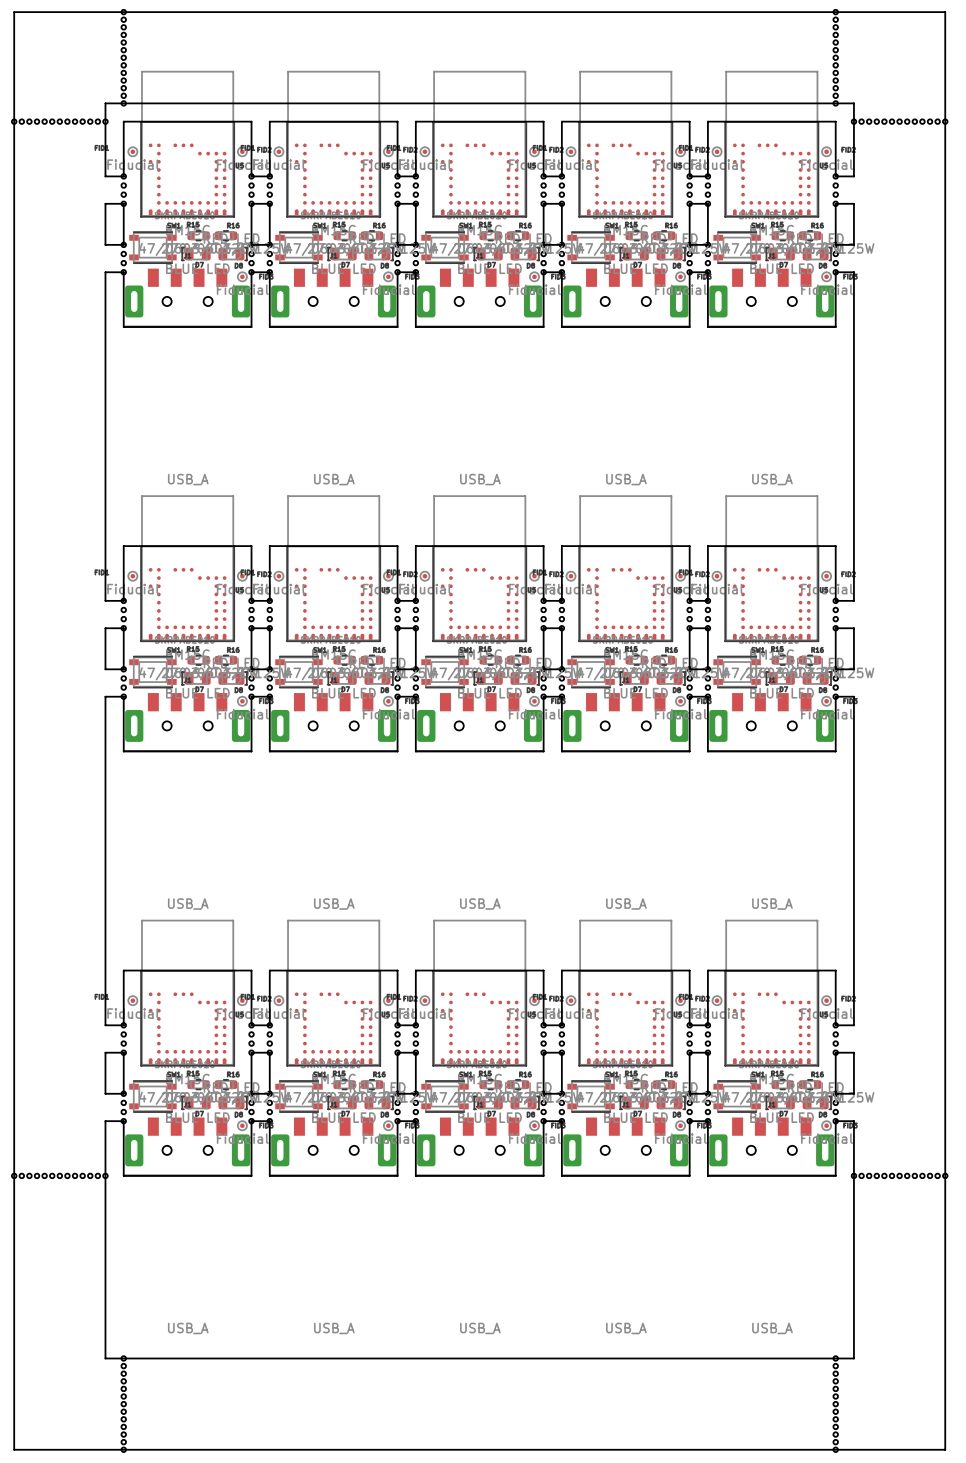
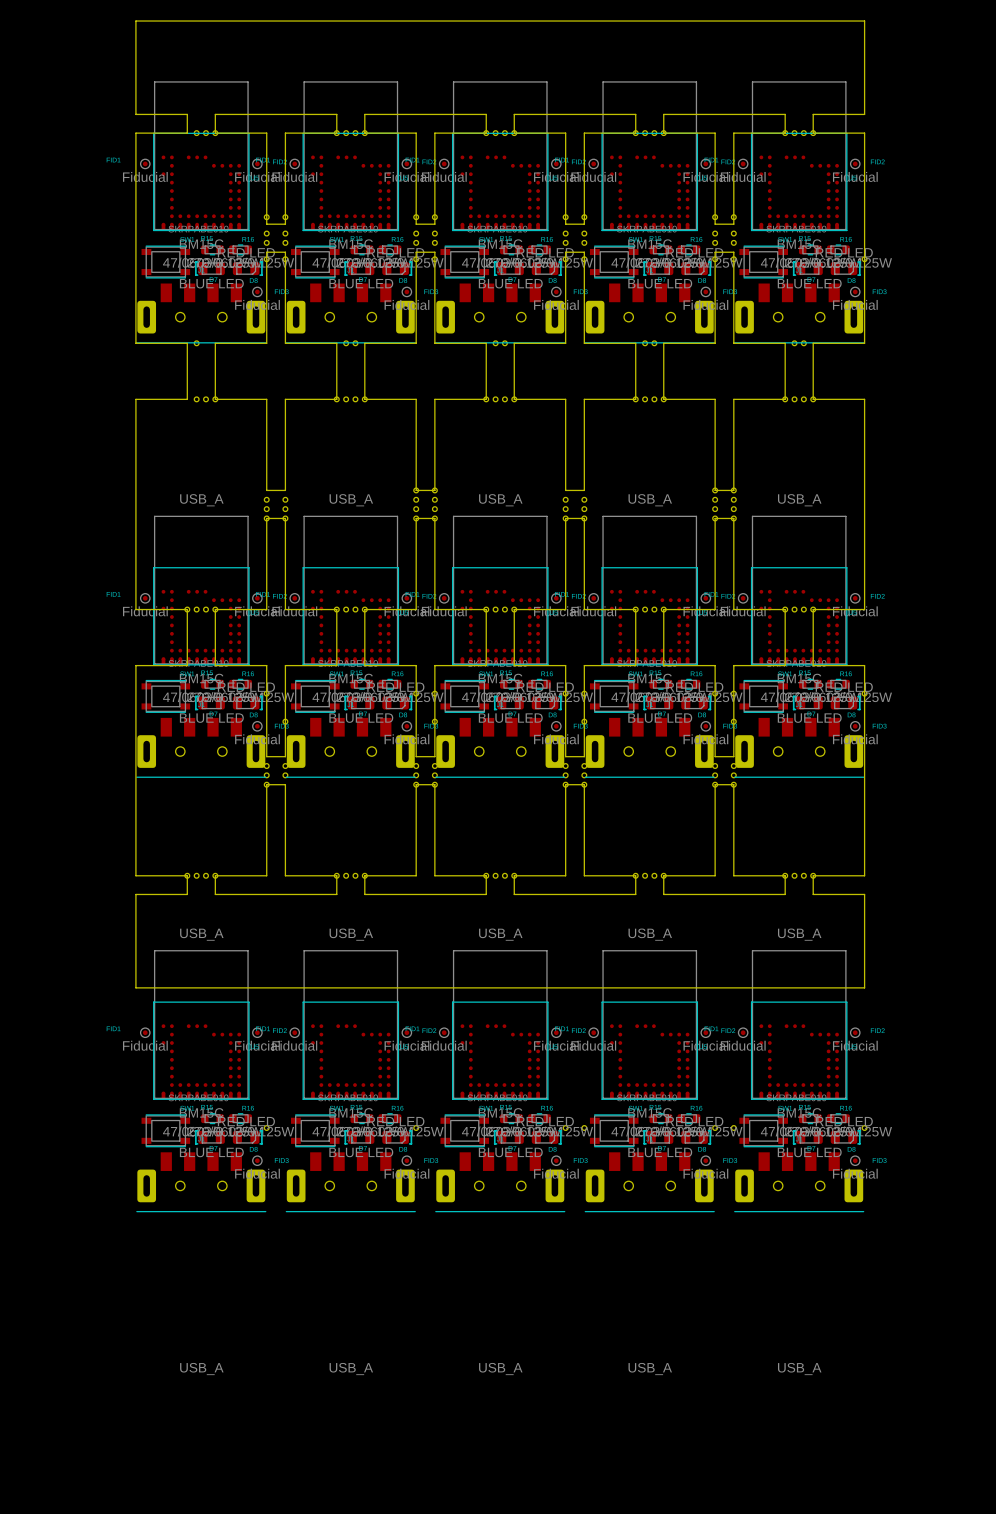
board edge: (123, 12) (14, 12) (14, 1449) (945, 1449) (945, 12) (835, 12) -> none
part: (123, 12) -> none
part: (835, 12) -> none
part: (123, 19) -> none
part: (835, 19) -> none
part: (123, 27) -> none
part: (835, 27) -> none
part: (123, 34) -> none
part: (835, 34) -> none
part: (123, 42) -> none
part: (835, 42) -> none
part: (123, 50) -> none
part: (835, 50) -> none
part: (123, 57) -> none
part: (835, 57) -> none
part: (123, 65) -> none
part: (835, 65) -> none
part: (123, 72) -> none
part: (835, 72) -> none
part: (123, 80) -> none
part: (835, 80) -> none
part: (123, 88) -> none
part: (835, 88) -> none
part: (123, 95) -> none
part: (835, 95) -> none
board edge: (123, 103) (105, 103) (105, 176) (123, 176) -> (135, 114) (135, 21)
part: (123, 103) -> none
board edge: (173, 103) (201, 103) -> (187, 114) (187, 133)
board edge: (319, 103) (347, 103) -> (336, 114) (336, 133)
board edge: (466, 103) (493, 103) -> (486, 114) (486, 133)
board edge: (612, 103) (639, 103) -> (635, 114) (635, 133)
board edge: (758, 103) (785, 103) -> (785, 114) (785, 133)
board edge: (835, 103) (853, 103) (853, 176) (835, 176) -> (864, 114) (864, 21)
part: (835, 103) -> none
part: (14, 121) -> none
part: (21, 121) -> none
part: (29, 121) -> none
part: (37, 121) -> none
part: (44, 121) -> none
part: (52, 121) -> none
part: (59, 121) -> none
part: (67, 121) -> none
part: (75, 121) -> none
part: (82, 121) -> none
part: (90, 121) -> none
part: (97, 121) -> none
part: (105, 121) -> none
board edge: (173, 121) (201, 121) -> (215, 114) (215, 133)
part: none -> (196, 133)
part: none -> (206, 133)
part: none -> (215, 133)
board edge: (319, 121) (347, 121) -> (364, 114) (364, 133)
part: none -> (336, 133)
part: none -> (346, 133)
part: none -> (355, 133)
part: none -> (364, 133)
board edge: (466, 121) (493, 121) -> (514, 114) (514, 133)
part: none -> (486, 133)
part: none -> (495, 133)
part: none -> (504, 133)
part: none -> (514, 133)
board edge: (612, 121) (639, 121) -> (663, 114) (663, 133)
part: none -> (635, 133)
part: none -> (645, 133)
part: none -> (654, 133)
part: none -> (663, 133)
board edge: (758, 121) (785, 121) -> (813, 114) (813, 133)
part: none -> (785, 133)
part: none -> (794, 133)
part: none -> (803, 133)
part: none -> (813, 133)
part: (853, 121) -> none
part: (861, 121) -> none
part: (869, 121) -> none
part: (876, 121) -> none
part: (884, 121) -> none
part: (892, 121) -> none
part: (899, 121) -> none
part: (907, 121) -> none
part: (914, 121) -> none
part: (922, 121) -> none
part: (930, 121) -> none
part: (937, 121) -> none
part: (945, 121) -> none
part: (123, 176) -> none
board edge: (251, 176) (269, 176) -> (266, 189) (266, 217)
part: (251, 176) -> none
part: (269, 176) -> none
board edge: (397, 176) (415, 176) -> (416, 189) (416, 217)
part: (397, 176) -> none
part: (415, 176) -> none
board edge: (543, 176) (561, 176) -> (565, 189) (565, 217)
part: (543, 176) -> none
part: (561, 176) -> none
board edge: (689, 176) (707, 176) -> (715, 189) (715, 217)
part: (689, 176) -> none
part: (707, 176) -> none
part: (835, 176) -> none
part: (123, 185) -> none
part: (251, 185) -> none
part: (269, 185) -> none
part: (397, 185) -> none
part: (415, 185) -> none
part: (543, 185) -> none
part: (561, 185) -> none
part: (689, 185) -> none
part: (707, 185) -> none
part: (835, 185) -> none
part: (123, 194) -> none
part: (251, 194) -> none
part: (269, 194) -> none
part: (397, 194) -> none
part: (415, 194) -> none
part: (543, 194) -> none
part: (561, 194) -> none
part: (689, 194) -> none
part: (707, 194) -> none
part: (835, 194) -> none
board edge: (123, 203) (105, 203) (105, 244) (123, 244) -> (135, 217) (135, 189)
part: (123, 203) -> none
board edge: (251, 203) (269, 203) -> (285, 189) (285, 217)
board edge: (397, 203) (415, 203) -> (434, 189) (434, 217)
board edge: (543, 203) (561, 203) -> (584, 189) (584, 217)
board edge: (689, 203) (707, 203) -> (733, 189) (733, 217)
board edge: (835, 203) (853, 203) (853, 244) (835, 244) -> (864, 217) (864, 189)
part: (835, 203) -> none
board edge: (251, 210) (251, 238) -> (266, 224) (285, 224)
board edge: (269, 210) (269, 238) -> (266, 252) (285, 252)
board edge: (397, 210) (397, 238) -> (416, 224) (434, 224)
board edge: (415, 210) (415, 238) -> (416, 252) (434, 252)
board edge: (543, 210) (543, 238) -> (565, 224) (584, 224)
board edge: (561, 210) (561, 238) -> (565, 252) (584, 252)
board edge: (689, 210) (689, 238) -> (715, 224) (733, 224)
board edge: (707, 210) (707, 238) -> (715, 252) (733, 252)
part: none -> (266, 233)
part: none -> (285, 233)
part: none -> (416, 233)
part: none -> (434, 233)
part: none -> (565, 233)
part: none -> (584, 233)
part: none -> (715, 233)
part: none -> (733, 233)
part: none -> (266, 242)
part: none -> (285, 242)
part: none -> (416, 242)
part: none -> (434, 242)
part: none -> (565, 242)
part: none -> (584, 242)
part: none -> (715, 242)
part: none -> (733, 242)
part: (123, 244) -> none
board edge: (251, 244) (269, 244) -> (266, 259) (266, 287)
board edge: (397, 244) (415, 244) -> (416, 259) (416, 287)
board edge: (543, 244) (561, 244) -> (565, 259) (565, 287)
board edge: (689, 244) (707, 244) -> (715, 259) (715, 287)
part: (123, 254) -> none
part: (251, 254) -> none
part: (269, 254) -> none
part: (397, 254) -> none
part: (415, 254) -> none
part: (543, 254) -> none
part: (561, 254) -> none
part: (689, 254) -> none
part: (707, 254) -> none
part: (835, 254) -> none
part: (123, 263) -> none
part: (251, 263) -> none
part: (269, 263) -> none
part: (397, 263) -> none
part: (415, 263) -> none
part: (543, 263) -> none
part: (561, 263) -> none
part: (689, 263) -> none
part: (707, 263) -> none
part: (835, 263) -> none
board edge: (123, 272) (105, 272) (105, 600) (123, 600) (123, 587) -> (135, 287) (135, 259)
part: (123, 272) -> none
board edge: (251, 272) (269, 272) -> (285, 259) (285, 287)
part: (251, 272) -> none
part: (269, 272) -> none
board edge: (397, 272) (415, 272) -> (434, 259) (434, 287)
part: (397, 272) -> none
part: (415, 272) -> none
board edge: (543, 272) (561, 272) -> (584, 259) (584, 287)
part: (543, 272) -> none
part: (561, 272) -> none
board edge: (689, 272) (707, 272) -> (733, 259) (733, 287)
part: (689, 272) -> none
part: (707, 272) -> none
board edge: (835, 272) (853, 272) (853, 600) (835, 600) (835, 587) -> (864, 287) (864, 259)
part: (835, 272) -> none
board edge: (173, 327) (201, 327) -> (336, 343) (336, 399) (285, 399) (285, 490) (266, 490) (266, 399) (215, 399) (215, 343)
part: none -> (196, 343)
board edge: (319, 327) (347, 327) -> (486, 343) (486, 399) (434, 399) (434, 490) (416, 490) (416, 399) (364, 399) (364, 343)
part: none -> (346, 343)
part: none -> (355, 343)
board edge: (466, 327) (493, 327) -> (635, 343) (635, 399) (584, 399) (584, 490) (565, 490) (565, 399) (514, 399) (514, 343)
part: none -> (495, 343)
part: none -> (504, 343)
board edge: (612, 327) (639, 327) -> (785, 343) (785, 399) (733, 399) (733, 490) (715, 490) (715, 399) (663, 399) (663, 343)
part: none -> (645, 343)
part: none -> (654, 343)
board edge: (758, 327) (785, 327) -> (864, 567) (864, 399) (813, 399) (813, 343)
part: none -> (794, 343)
part: none -> (803, 343)
part: none -> (196, 399)
part: none -> (206, 399)
part: none -> (215, 399)
part: none -> (336, 399)
part: none -> (346, 399)
part: none -> (355, 399)
part: none -> (364, 399)
part: none -> (486, 399)
part: none -> (495, 399)
part: none -> (504, 399)
part: none -> (514, 399)
part: none -> (635, 399)
part: none -> (645, 399)
part: none -> (654, 399)
part: none -> (663, 399)
part: none -> (785, 399)
part: none -> (794, 399)
part: none -> (803, 399)
part: none -> (813, 399)
part: none -> (416, 490)
part: none -> (434, 490)
part: none -> (715, 490)
part: none -> (733, 490)
part: none -> (266, 499)
part: none -> (285, 499)
part: none -> (416, 499)
part: none -> (434, 499)
part: none -> (565, 499)
part: none -> (584, 499)
part: none -> (715, 499)
part: none -> (733, 499)
part: none -> (266, 509)
part: none -> (285, 509)
part: none -> (416, 509)
part: none -> (434, 509)
part: none -> (565, 509)
part: none -> (584, 509)
part: none -> (715, 509)
part: none -> (733, 509)
part: none -> (266, 518)
part: none -> (285, 518)
part: none -> (416, 518)
part: none -> (434, 518)
part: none -> (565, 518)
part: none -> (584, 518)
part: none -> (715, 518)
part: none -> (733, 518)
board edge: (123, 546) (251, 546) -> (135, 567) (135, 399) (187, 399) (187, 343)
board edge: (269, 546) (397, 546) -> (285, 567) (285, 518) (266, 518) (266, 567)
board edge: (415, 546) (543, 546) -> (434, 567) (434, 518) (416, 518) (416, 567)
board edge: (561, 546) (689, 546) -> (584, 567) (584, 518) (565, 518) (565, 567)
board edge: (707, 546) (835, 546) -> (733, 567) (733, 518) (715, 518) (715, 567)
board edge: none -> (135, 609) (187, 609) (187, 665) (135, 665)
part: none -> (187, 609)
part: none -> (196, 609)
part: none -> (206, 609)
part: none -> (215, 609)
board edge: (251, 587) (251, 600) (269, 600) (269, 587) -> (266, 609) (215, 609) (215, 665) (266, 665)
part: none -> (336, 609)
part: none -> (346, 609)
part: none -> (355, 609)
part: none -> (364, 609)
board edge: (397, 587) (397, 600) (415, 600) (415, 587) -> (416, 609) (364, 609) (364, 665) (416, 665)
part: none -> (486, 609)
part: none -> (495, 609)
part: none -> (504, 609)
part: none -> (514, 609)
board edge: (543, 587) (543, 600) (561, 600) (561, 587) -> (565, 609) (514, 609) (514, 665) (565, 665)
part: none -> (635, 609)
part: none -> (645, 609)
part: none -> (654, 609)
part: none -> (663, 609)
board edge: (689, 587) (689, 600) (707, 600) (707, 587) -> (715, 609) (663, 609) (663, 665) (715, 665)
part: none -> (785, 609)
part: none -> (794, 609)
part: none -> (803, 609)
part: none -> (813, 609)
board edge: none -> (864, 609) (813, 609) (813, 665) (864, 665)
part: (123, 600) -> none
part: (251, 600) -> none
part: (269, 600) -> none
part: (397, 600) -> none
part: (415, 600) -> none
part: (543, 600) -> none
part: (561, 600) -> none
part: (689, 600) -> none
part: (707, 600) -> none
part: (835, 600) -> none
part: (123, 609) -> none
part: (251, 609) -> none
part: (269, 609) -> none
part: (397, 609) -> none
part: (415, 609) -> none
part: (543, 609) -> none
part: (561, 609) -> none
part: (689, 609) -> none
part: (707, 609) -> none
part: (835, 609) -> none
part: (123, 619) -> none
part: (251, 619) -> none
part: (269, 619) -> none
part: (397, 619) -> none
part: (415, 619) -> none
part: (543, 619) -> none
part: (561, 619) -> none
part: (689, 619) -> none
part: (707, 619) -> none
part: (835, 619) -> none
part: (123, 628) -> none
part: (251, 628) -> none
part: (269, 628) -> none
part: (397, 628) -> none
part: (415, 628) -> none
part: (543, 628) -> none
part: (561, 628) -> none
part: (689, 628) -> none
part: (707, 628) -> none
part: (835, 628) -> none
board edge: (123, 641) (123, 628) (105, 628) (105, 669) (123, 669) -> (135, 721) (135, 693)
board edge: (251, 641) (251, 628) (269, 628) (269, 641) -> (285, 609) (336, 609) (336, 665) (285, 665)
board edge: (397, 641) (397, 628) (415, 628) (415, 641) -> (434, 609) (486, 609) (486, 665) (434, 665)
board edge: (543, 641) (543, 628) (561, 628) (561, 641) -> (584, 609) (635, 609) (635, 665) (584, 665)
board edge: (689, 641) (689, 628) (707, 628) (707, 641) -> (733, 609) (785, 609) (785, 665) (733, 665)
board edge: (835, 641) (835, 628) (853, 628) (853, 669) (835, 669) -> (864, 721) (864, 693)
part: (123, 669) -> none
board edge: (251, 669) (269, 669) -> (266, 693) (266, 721)
part: (269, 669) -> none
board edge: (397, 669) (415, 669) -> (416, 693) (416, 721)
board edge: (543, 669) (561, 669) -> (565, 693) (565, 721)
board edge: (689, 669) (707, 669) -> (715, 693) (715, 721)
part: (123, 678) -> none
part: (251, 678) -> none
part: (269, 678) -> none
part: (397, 678) -> none
part: (415, 678) -> none
part: (543, 678) -> none
part: (561, 678) -> none
part: (689, 678) -> none
part: (707, 678) -> none
part: (835, 678) -> none
part: (123, 687) -> none
part: (251, 687) -> none
part: (269, 687) -> none
part: (397, 687) -> none
part: (415, 687) -> none
part: (543, 687) -> none
part: (561, 687) -> none
part: (689, 687) -> none
part: (707, 687) -> none
part: (835, 687) -> none
board edge: (123, 696) (105, 696) (105, 1025) (123, 1025) (123, 970) (251, 970) (251, 1025) (269, 1025) (269, 970) (397, 970) (397, 1025) (415, 1025) (415, 970) (543, 970) (543, 1025) (561, 1025) (561, 970) (689, 970) (689, 1025) (707, 1025) (707, 970) (835, 970) (835, 1025) (853, 1025) (853, 696) (835, 696) -> none
part: (123, 696) -> none
board edge: (251, 696) (269, 696) -> (285, 693) (285, 721)
part: (251, 696) -> none
board edge: (397, 696) (415, 696) -> (434, 693) (434, 721)
part: (397, 696) -> none
board edge: (543, 696) (561, 696) -> (584, 693) (584, 721)
part: (543, 696) -> none
board edge: (689, 696) (707, 696) -> (733, 693) (733, 721)
part: (689, 696) -> none
part: (835, 696) -> none
board edge: (251, 730) (251, 751) (123, 751) -> (864, 777) (864, 875) (813, 875) (813, 894) (864, 894) (864, 987) (135, 987) (135, 894) (187, 894) (187, 875) (135, 875) (135, 777)
board edge: (269, 730) (269, 751) (397, 751) (397, 730) -> (285, 756) (266, 756)
board edge: (415, 730) (415, 751) (543, 751) (543, 730) -> (434, 756) (416, 756)
board edge: (561, 730) (561, 751) (689, 751) (689, 730) -> (584, 756) (565, 756)
board edge: (707, 730) (707, 751) (835, 751) -> (733, 756) (715, 756)
part: none -> (266, 766)
part: none -> (285, 766)
part: none -> (416, 766)
part: none -> (434, 766)
part: none -> (565, 766)
part: none -> (584, 766)
part: none -> (715, 766)
part: none -> (733, 766)
part: none -> (266, 775)
part: none -> (285, 775)
part: none -> (416, 775)
part: none -> (434, 775)
part: none -> (565, 775)
part: none -> (584, 775)
part: none -> (715, 775)
part: none -> (733, 775)
board edge: none -> (266, 784) (266, 875) (215, 875) (215, 894) (336, 894) (336, 875) (285, 875) (285, 784) (266, 784)
part: none -> (266, 784)
board edge: none -> (416, 784) (434, 784) (434, 875) (486, 875) (486, 894) (364, 894) (364, 875) (416, 875) (416, 784)
part: none -> (416, 784)
part: none -> (434, 784)
board edge: none -> (565, 784) (584, 784) (584, 875) (635, 875) (635, 894) (514, 894) (514, 875) (565, 875) (565, 784)
part: none -> (565, 784)
part: none -> (584, 784)
board edge: none -> (715, 784) (733, 784) (733, 875) (785, 875) (785, 894) (663, 894) (663, 875) (715, 875) (715, 784)
part: none -> (715, 784)
part: none -> (733, 784)
part: none -> (187, 875)
part: none -> (196, 875)
part: none -> (206, 875)
part: none -> (215, 875)
part: none -> (336, 875)
part: none -> (346, 875)
part: none -> (355, 875)
part: none -> (364, 875)
part: none -> (486, 875)
part: none -> (495, 875)
part: none -> (504, 875)
part: none -> (514, 875)
part: none -> (635, 875)
part: none -> (645, 875)
part: none -> (654, 875)
part: none -> (663, 875)
part: none -> (785, 875)
part: none -> (794, 875)
part: none -> (803, 875)
part: none -> (813, 875)
part: (123, 1025) -> none
part: (251, 1025) -> none
part: (269, 1025) -> none
part: (397, 1025) -> none
part: (415, 1025) -> none
part: (543, 1025) -> none
part: (561, 1025) -> none
part: (689, 1025) -> none
part: (707, 1025) -> none
part: (835, 1025) -> none
part: (123, 1034) -> none
part: (251, 1034) -> none
part: (269, 1034) -> none
part: (397, 1034) -> none
part: (415, 1034) -> none
part: (543, 1034) -> none
part: (561, 1034) -> none
part: (689, 1034) -> none
part: (707, 1034) -> none
part: (835, 1034) -> none
part: (123, 1043) -> none
part: (251, 1043) -> none
part: (269, 1043) -> none
part: (397, 1043) -> none
part: (415, 1043) -> none
part: (543, 1043) -> none
part: (561, 1043) -> none
part: (689, 1043) -> none
part: (707, 1043) -> none
part: (835, 1043) -> none
board edge: (105, 1052) (105, 1093) (123, 1093) (123, 1052) (105, 1052) -> none
part: (123, 1052) -> none
board edge: (251, 1052) (269, 1052) (269, 1093) (251, 1093) (251, 1052) -> none
part: (251, 1052) -> none
part: (269, 1052) -> none
board edge: (397, 1052) (415, 1052) (415, 1093) (397, 1093) (397, 1052) -> none
part: (397, 1052) -> none
part: (415, 1052) -> none
board edge: (543, 1052) (561, 1052) (561, 1093) (543, 1093) (543, 1052) -> none
part: (543, 1052) -> none
part: (561, 1052) -> none
board edge: (689, 1052) (707, 1052) (707, 1093) (689, 1093) (689, 1052) -> none
part: (689, 1052) -> none
part: (707, 1052) -> none
board edge: (835, 1052) (853, 1052) (853, 1093) (835, 1093) (835, 1052) -> none
part: (835, 1052) -> none
part: (123, 1093) -> none
part: (269, 1093) -> none
part: (415, 1093) -> none
part: (123, 1102) -> none
part: (251, 1102) -> none
part: (269, 1102) -> none
part: (397, 1102) -> none
part: (415, 1102) -> none
part: (543, 1102) -> none
part: (561, 1102) -> none
part: (689, 1102) -> none
part: (707, 1102) -> none
part: (835, 1102) -> none
part: (123, 1112) -> none
part: (251, 1112) -> none
part: (269, 1112) -> none
part: (397, 1112) -> none
part: (415, 1112) -> none
part: (543, 1112) -> none
part: (561, 1112) -> none
part: (689, 1112) -> none
part: (707, 1112) -> none
part: (835, 1112) -> none
board edge: (105, 1121) (105, 1358) (853, 1358) (853, 1121) (835, 1121) (835, 1175) (707, 1175) (707, 1121) (689, 1121) (689, 1175) (561, 1175) (561, 1121) (543, 1121) (543, 1175) (415, 1175) (415, 1121) (397, 1121) (397, 1175) (269, 1175) (269, 1121) (251, 1121) (251, 1175) (123, 1175) (123, 1121) (105, 1121) -> none
part: (123, 1121) -> none
part: (251, 1121) -> none
part: (269, 1121) -> none
part: (397, 1121) -> none
part: (415, 1121) -> none
part: (543, 1121) -> none
part: (561, 1121) -> none
part: (689, 1121) -> none
part: (707, 1121) -> none
part: (835, 1121) -> none
part: (14, 1175) -> none
part: (21, 1175) -> none
part: (29, 1175) -> none
part: (37, 1175) -> none
part: (44, 1175) -> none
part: (52, 1175) -> none
part: (59, 1175) -> none
part: (67, 1175) -> none
part: (75, 1175) -> none
part: (82, 1175) -> none
part: (90, 1175) -> none
part: (97, 1175) -> none
part: (105, 1175) -> none
part: (853, 1175) -> none
part: (861, 1175) -> none
part: (869, 1175) -> none
part: (876, 1175) -> none
part: (884, 1175) -> none
part: (892, 1175) -> none
part: (899, 1175) -> none
part: (907, 1175) -> none
part: (914, 1175) -> none
part: (922, 1175) -> none
part: (930, 1175) -> none
part: (937, 1175) -> none
part: (945, 1175) -> none
part: (123, 1358) -> none
part: (835, 1358) -> none
part: (123, 1366) -> none
part: (835, 1366) -> none
part: (123, 1373) -> none
part: (835, 1373) -> none
part: (123, 1381) -> none
part: (835, 1381) -> none
part: (123, 1388) -> none
part: (835, 1388) -> none
part: (123, 1396) -> none
part: (835, 1396) -> none
part: (123, 1404) -> none
part: (835, 1404) -> none
part: (123, 1411) -> none
part: (835, 1411) -> none
part: (123, 1419) -> none
part: (835, 1419) -> none
part: (123, 1426) -> none
part: (835, 1426) -> none
part: (123, 1434) -> none
part: (835, 1434) -> none
part: (123, 1442) -> none
part: (835, 1442) -> none
part: (123, 1449) -> none
part: (835, 1449) -> none

